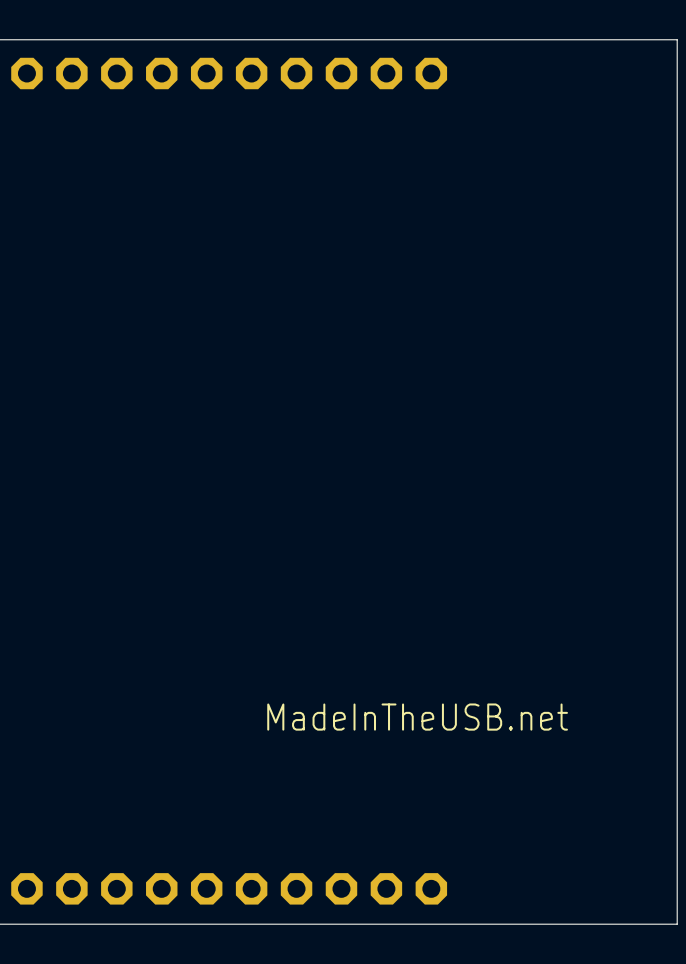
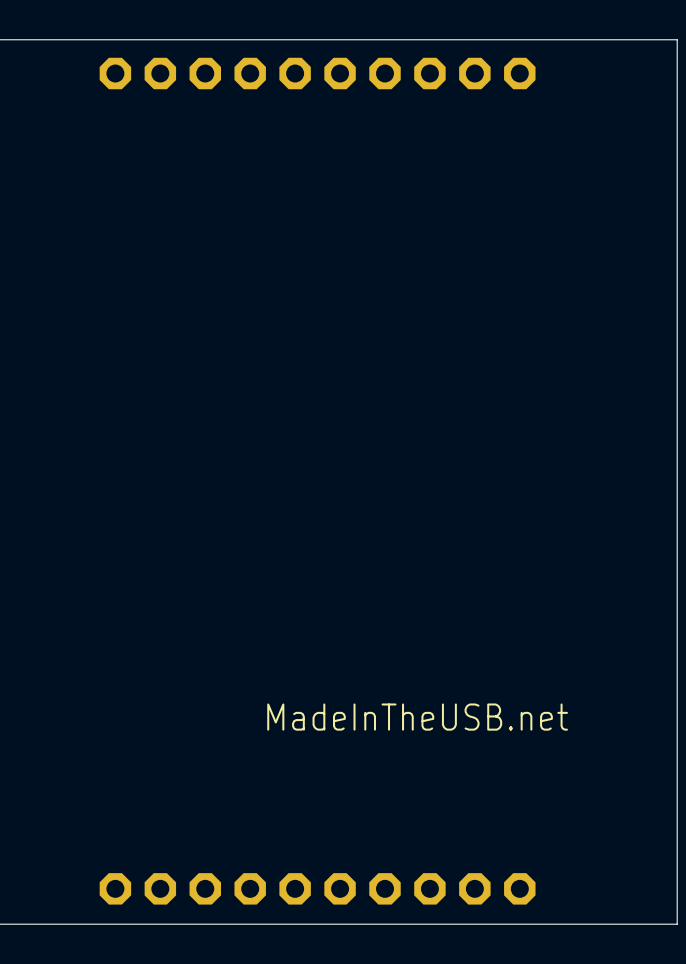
part position: (229, 73) -> (317, 73)
part position: (229, 888) -> (317, 888)

